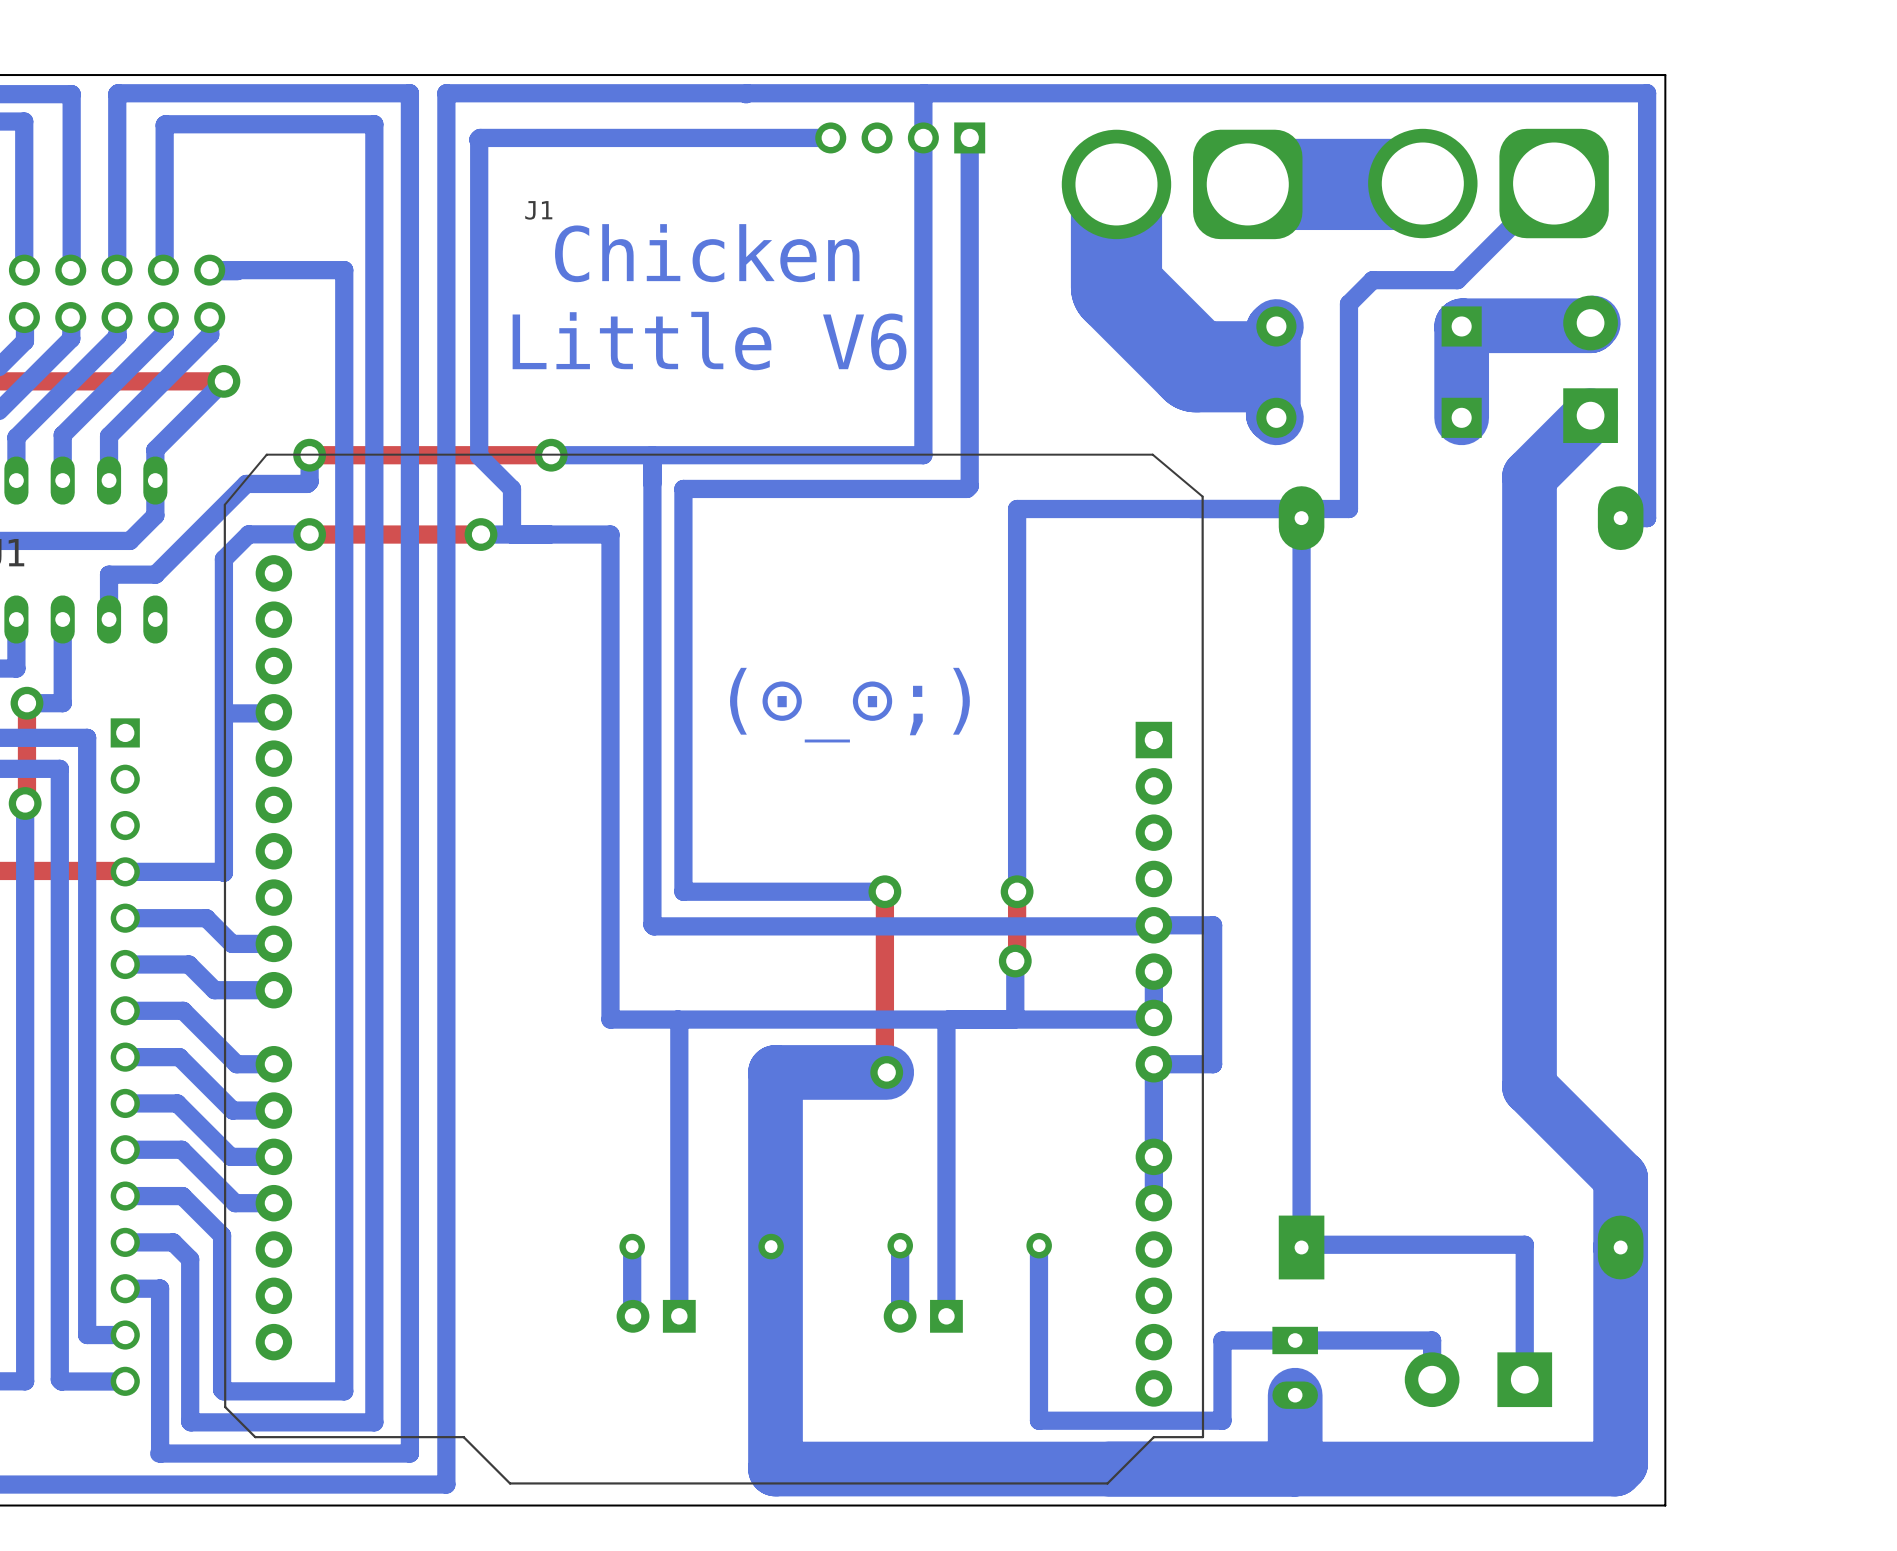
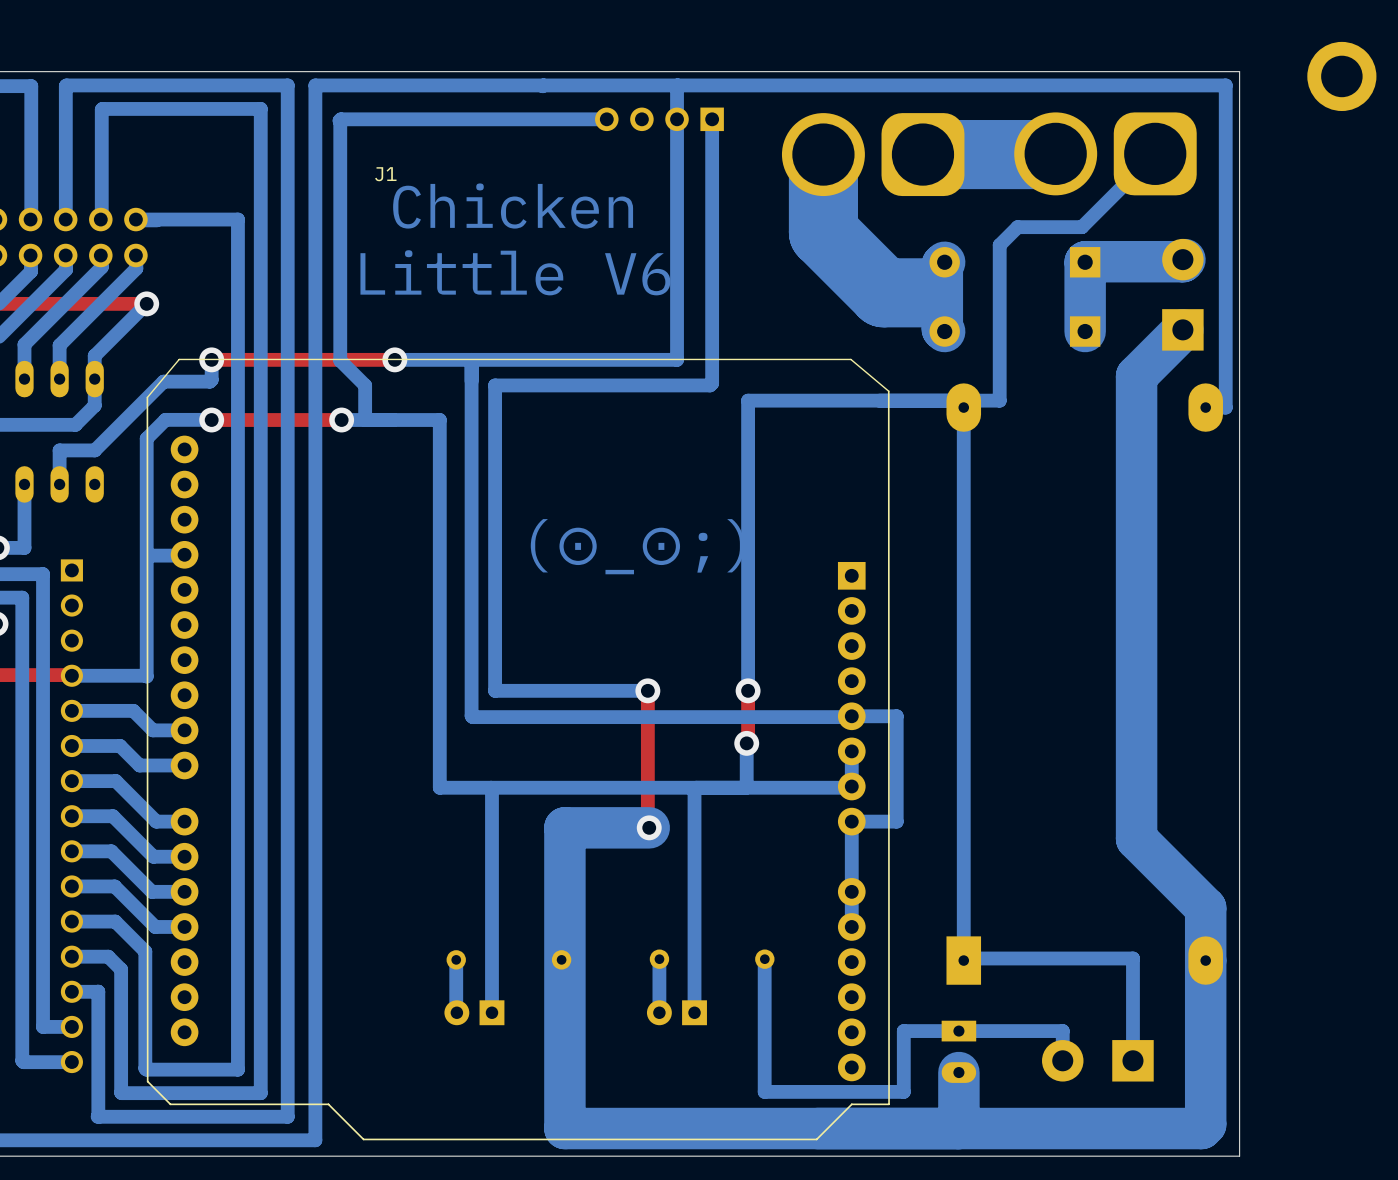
part: none -> (1341, 76)

